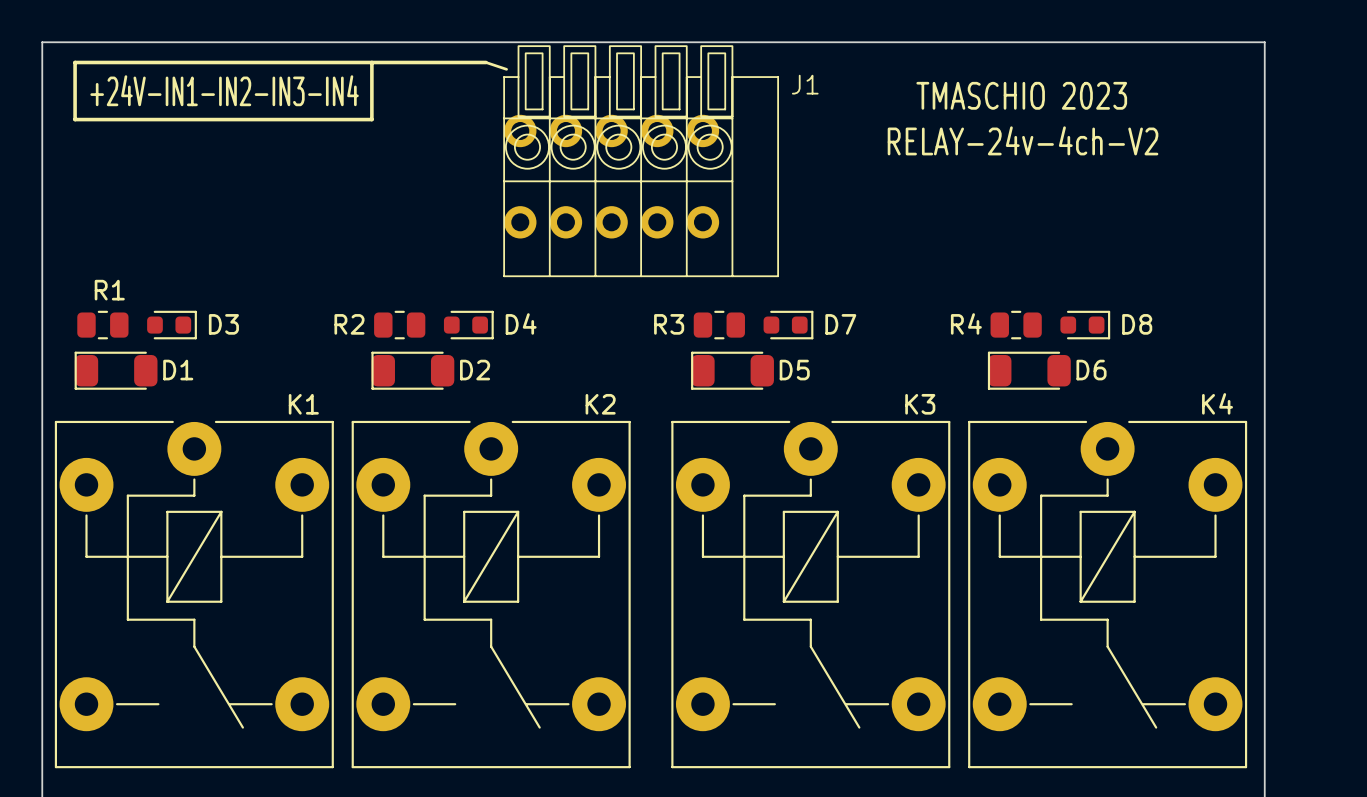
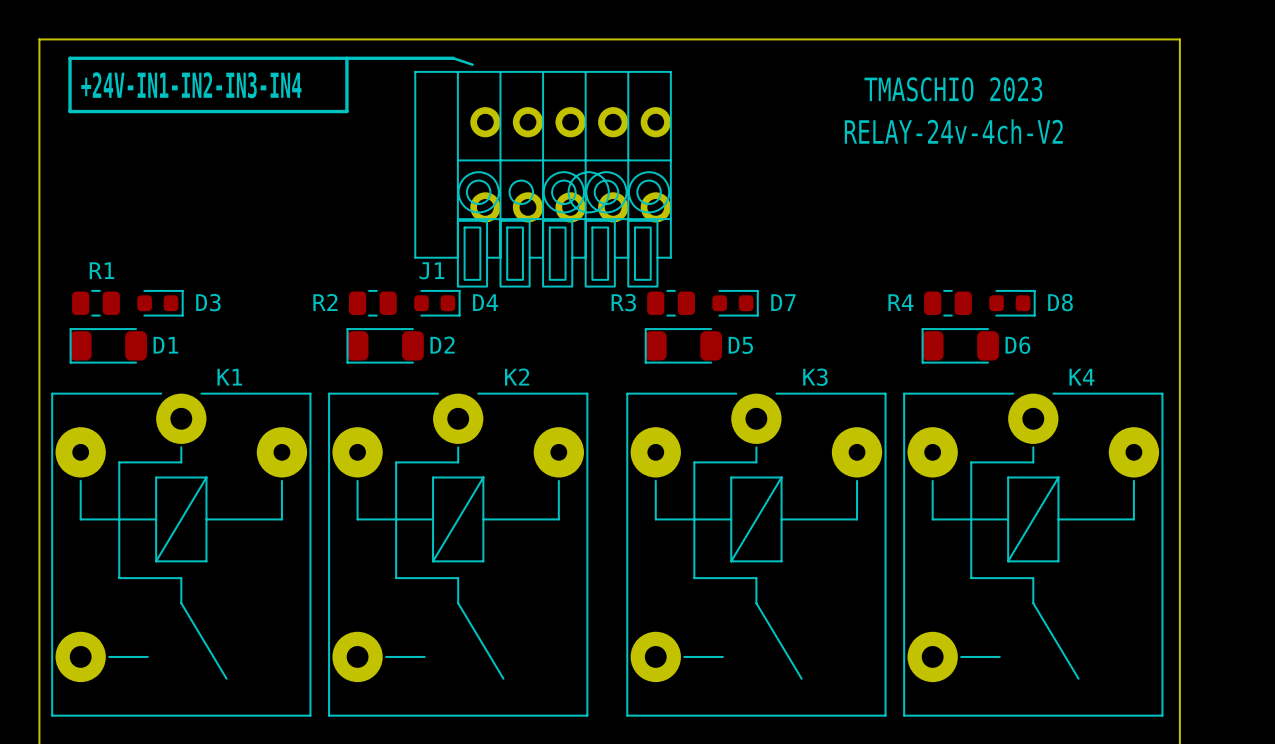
J1 footprint: [503, 45, 779, 278] -> [414, 71, 672, 288]
J1 name position: J1 (805, 84) -> J1 (431, 270)
K4 name position: K4 (1217, 403) -> K4 (1081, 377)
K1 name position: K1 (303, 404) -> K1 (229, 377)
K2 name position: K2 (600, 404) -> K2 (517, 377)
K3 name position: K3 (920, 404) -> K3 (815, 377)
K1 footprint: [54, 420, 334, 769] -> [51, 392, 312, 717]
K2 footprint: [351, 420, 631, 769] -> [328, 392, 589, 717]
K3 footprint: [671, 420, 951, 769] -> [626, 392, 887, 717]
K4 footprint: [968, 420, 1248, 769] -> [903, 392, 1164, 717]

